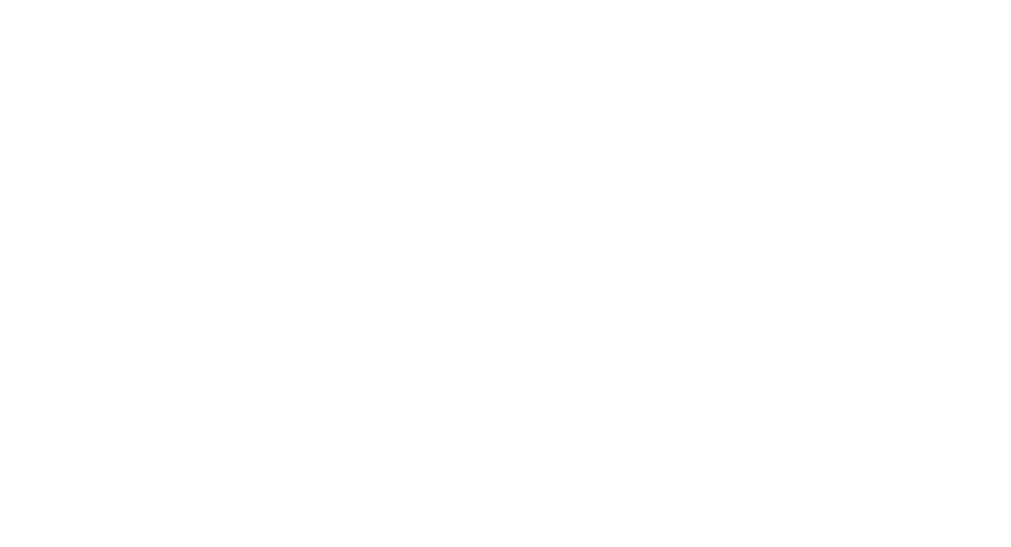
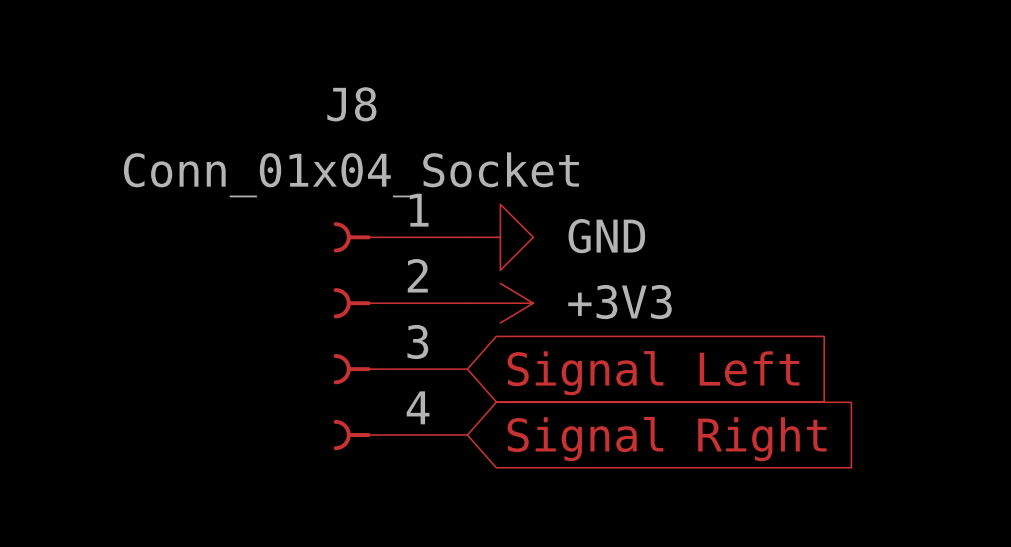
power symbol: none -> GND (500, 237)
power symbol: none -> +3V3 (500, 303)
J8: none -> Conn_01x04_Socket (400, 336)
global label: none -> Signal Left (653, 373)
global label: none -> Signal Right (667, 439)

